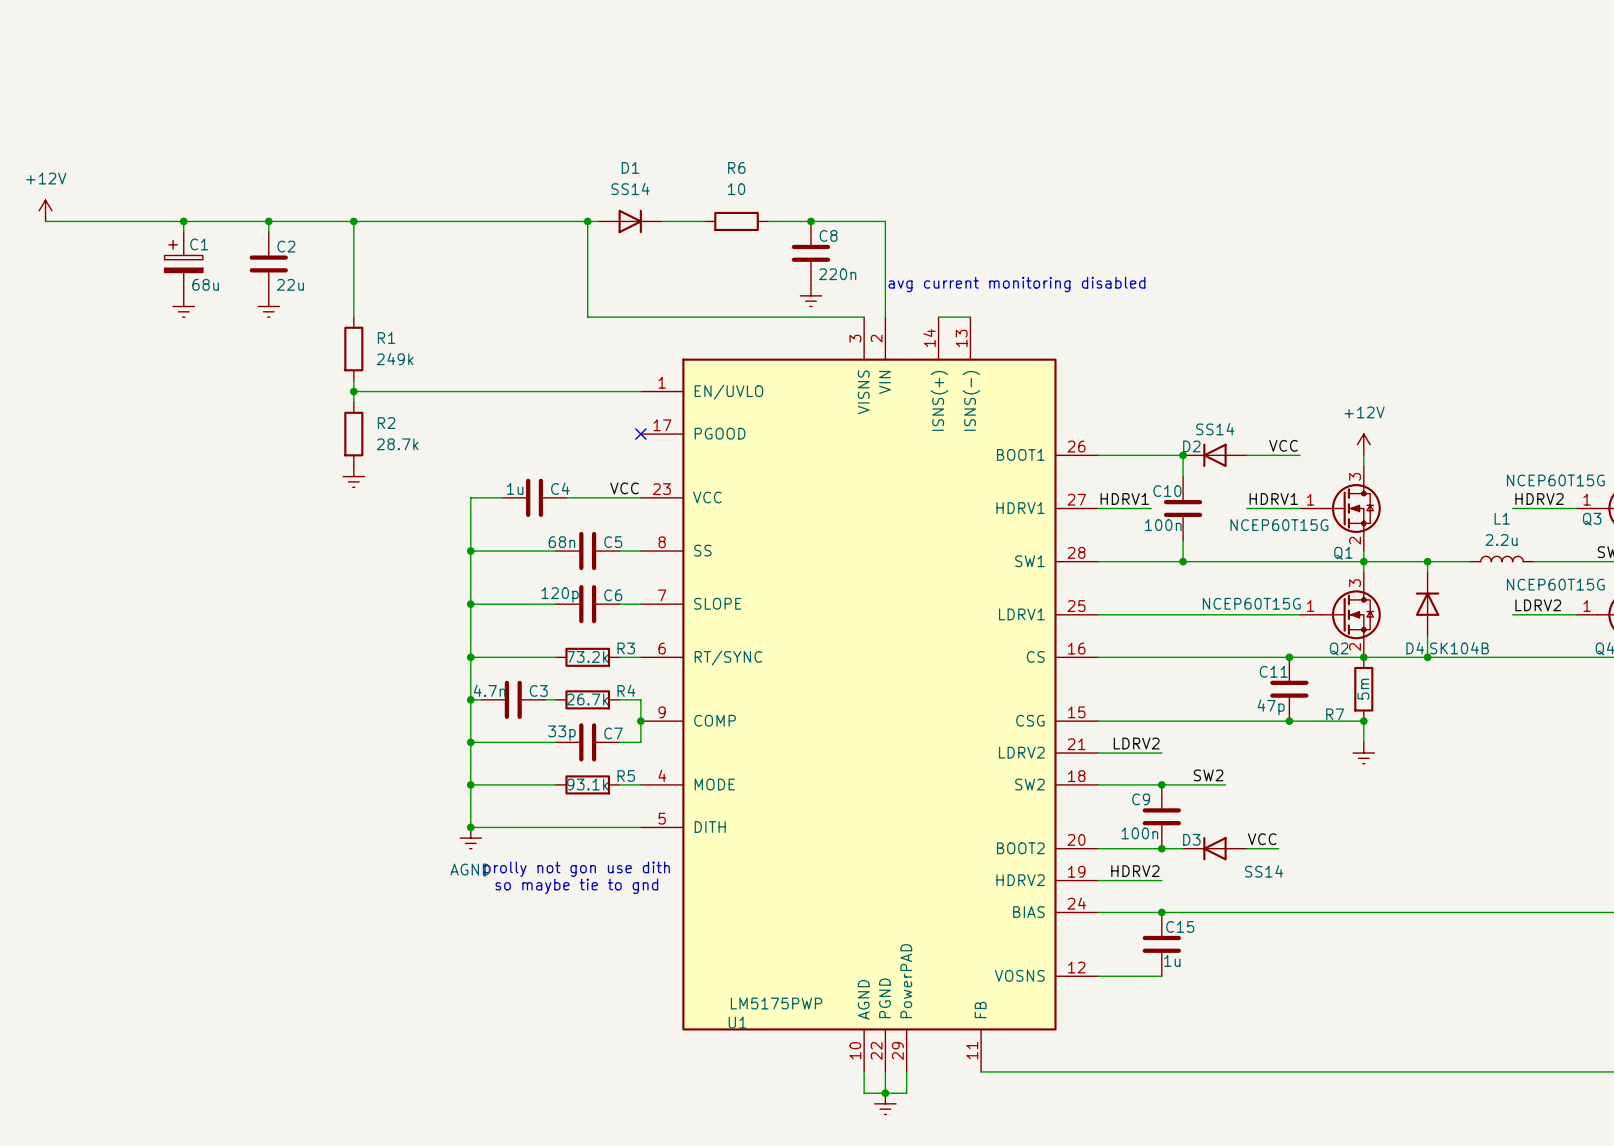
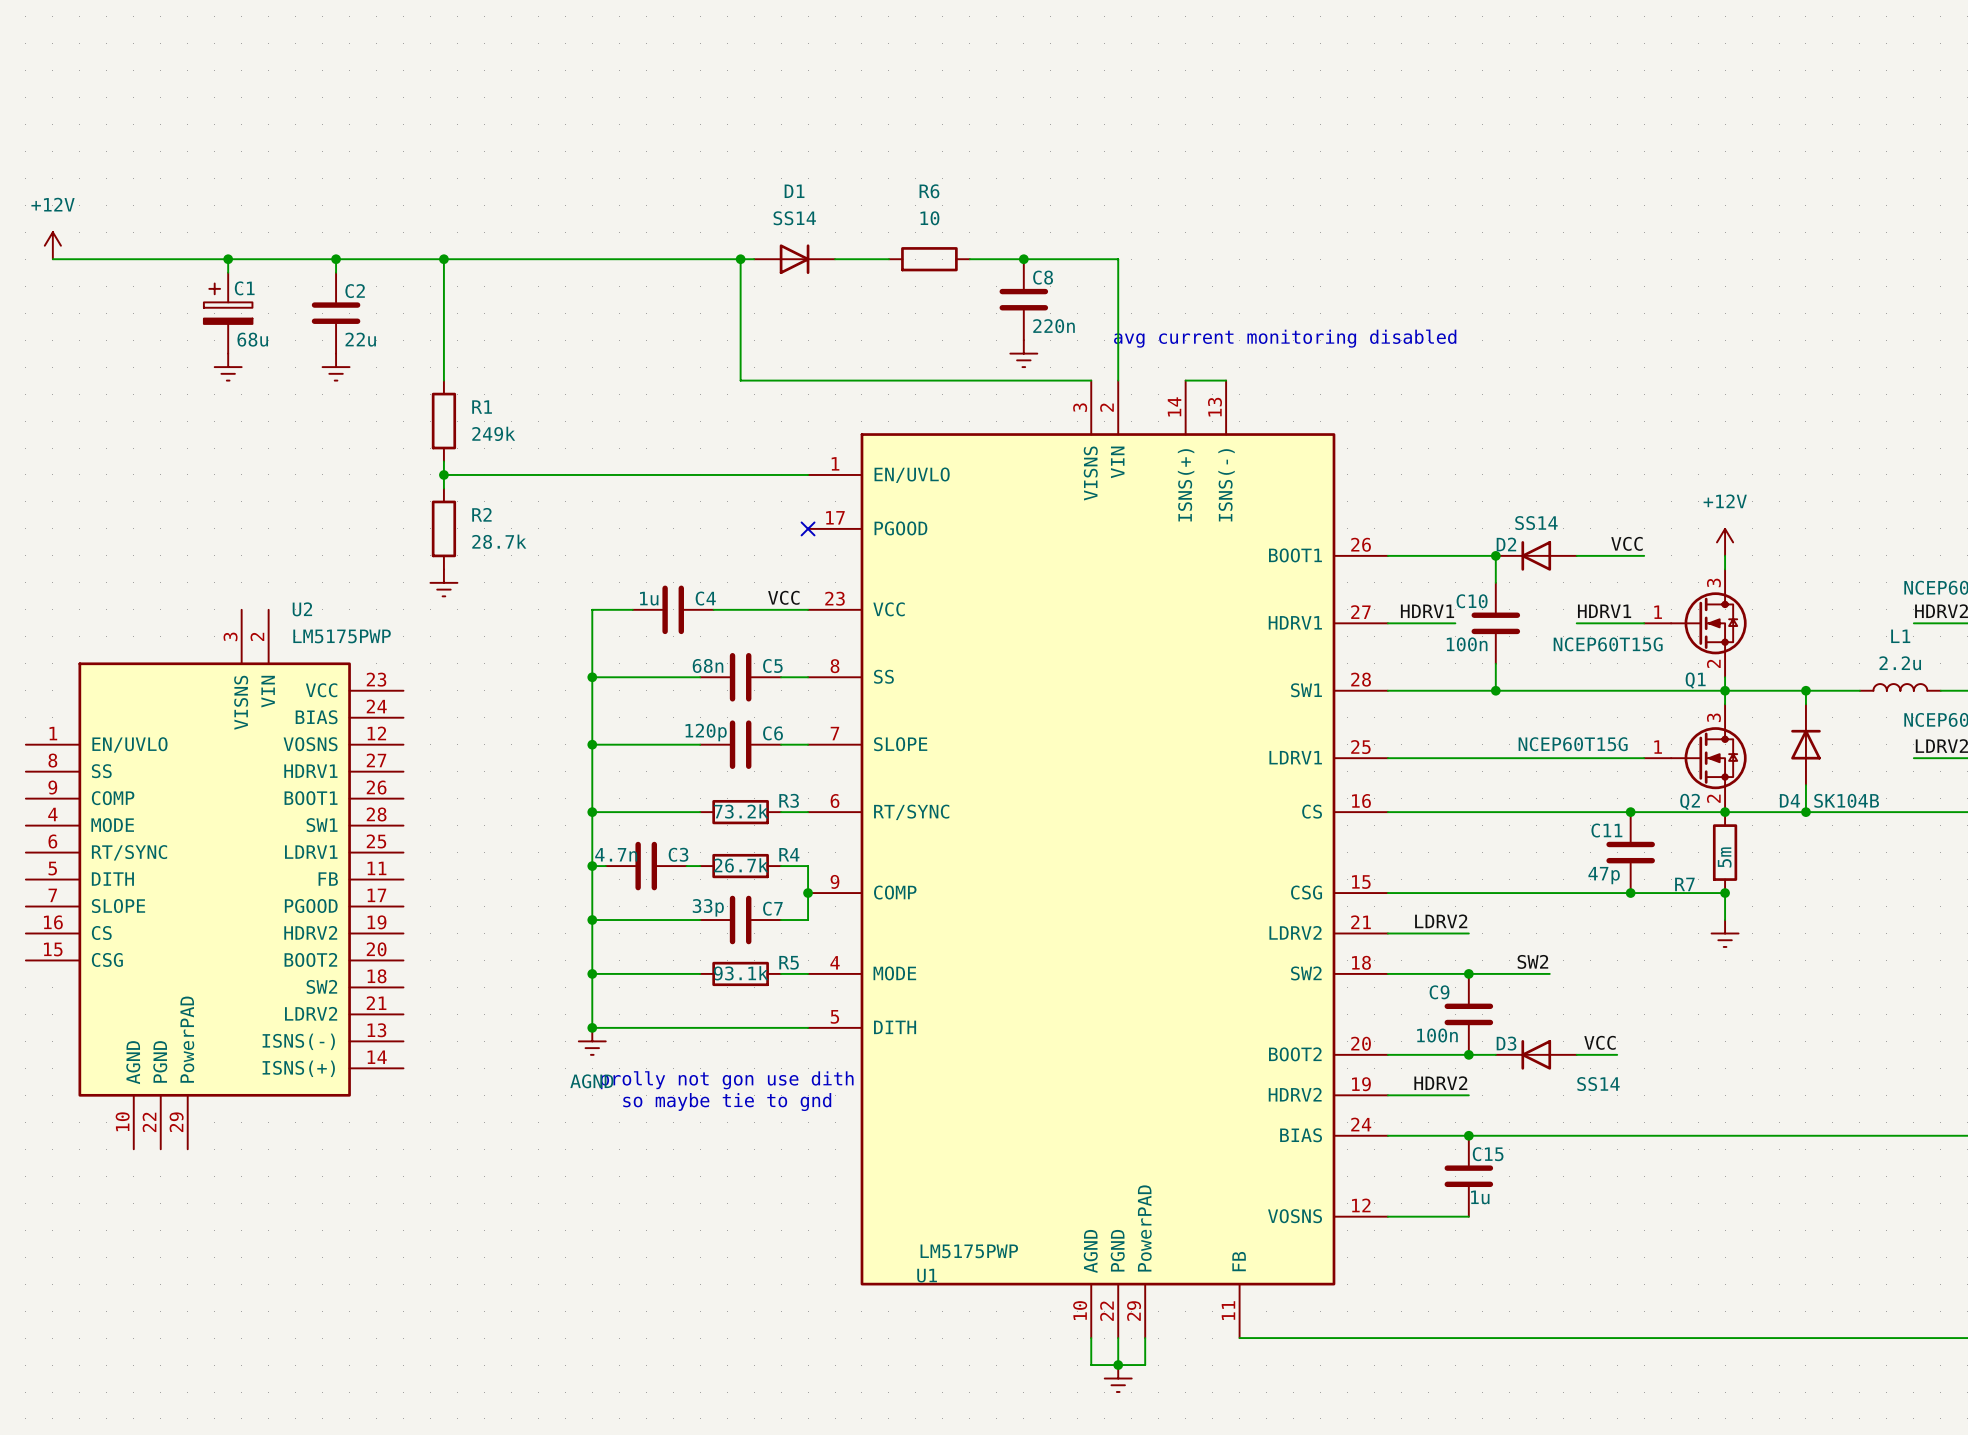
U2: none -> LM5175PWP (214, 879)

